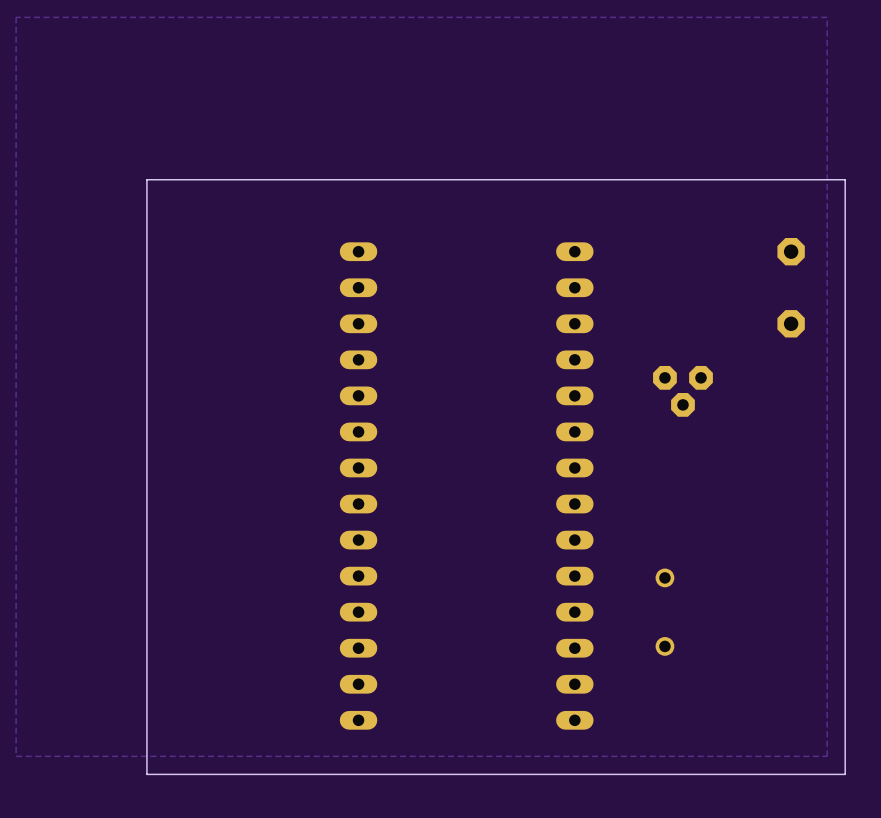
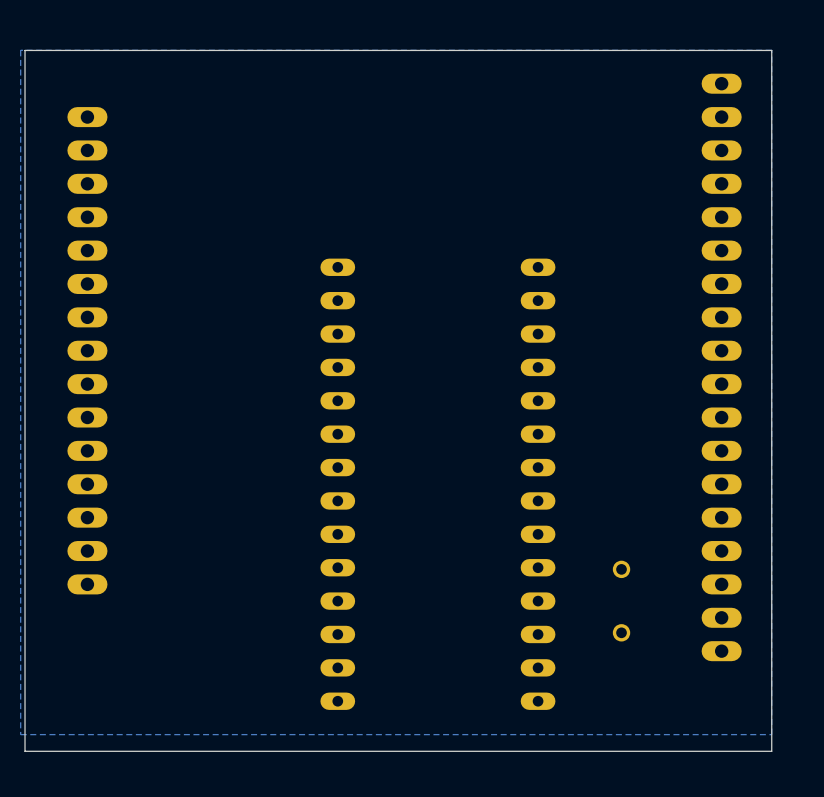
part: (791, 251) -> none
part: (791, 323) -> none
part: none -> (87, 350)
part: none -> (721, 367)
part: (682, 391) -> none
board edge: (827, 774) (845, 774) (845, 179) (146, 179) (146, 774) -> (771, 751) (771, 50) (25, 50) (25, 751) (141, 751)

